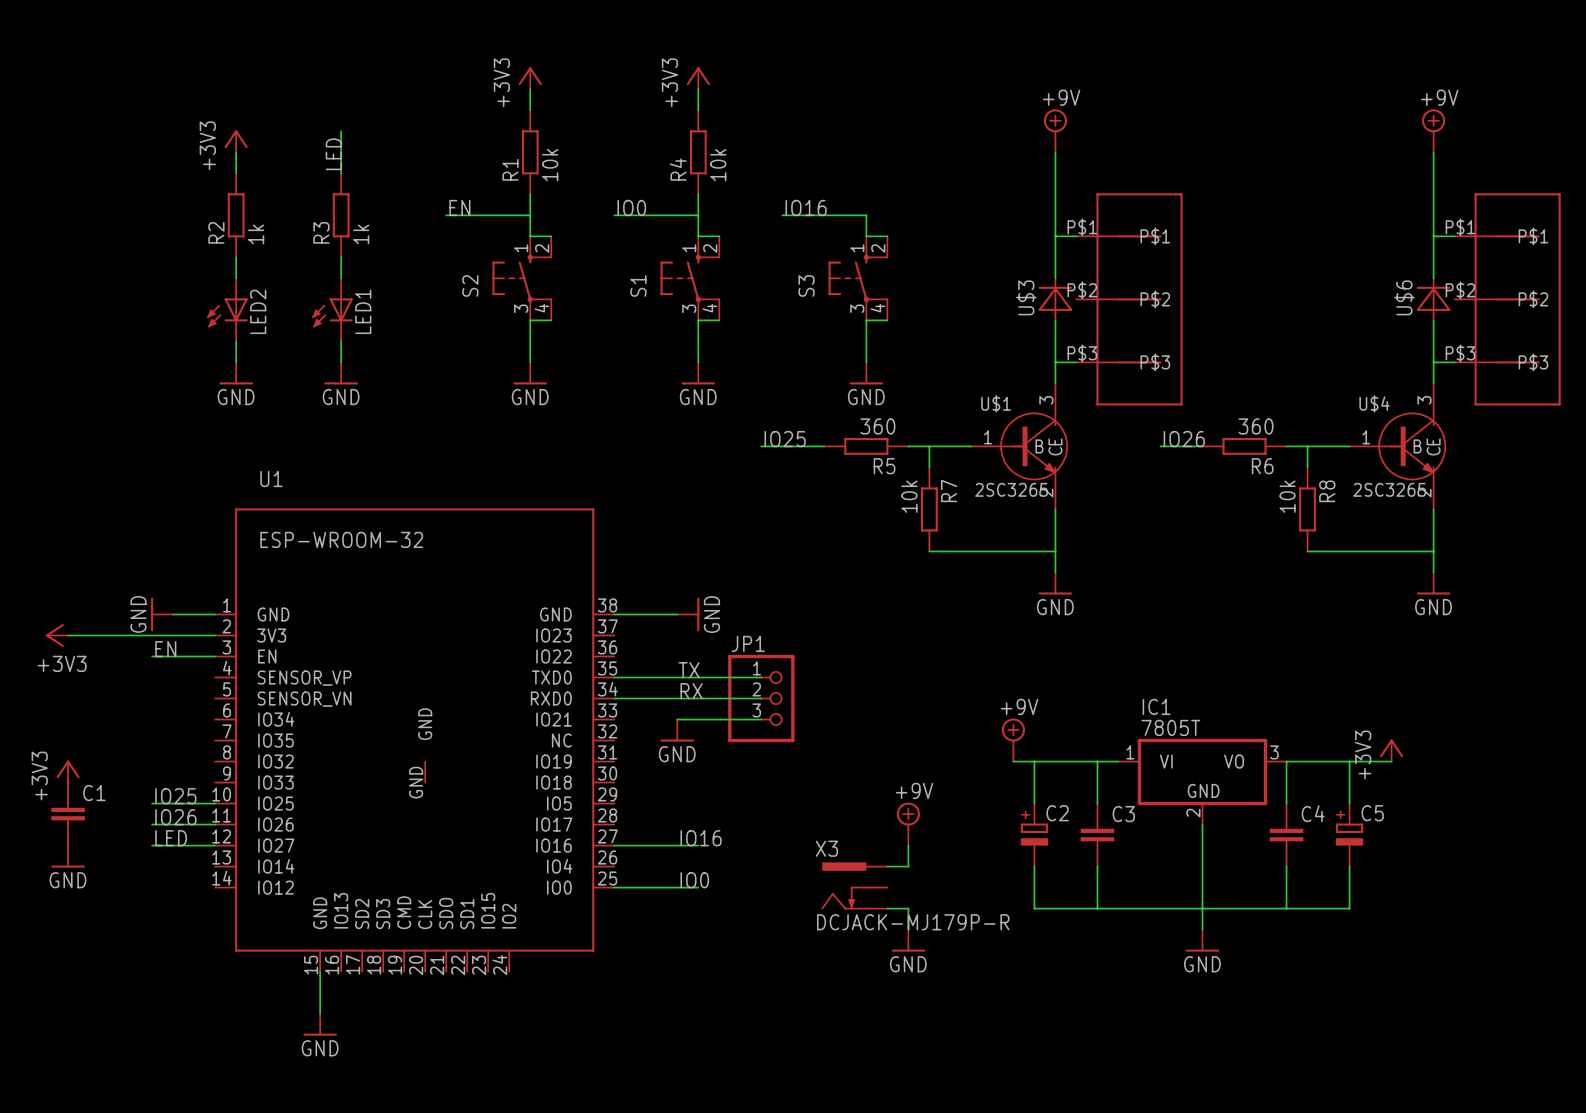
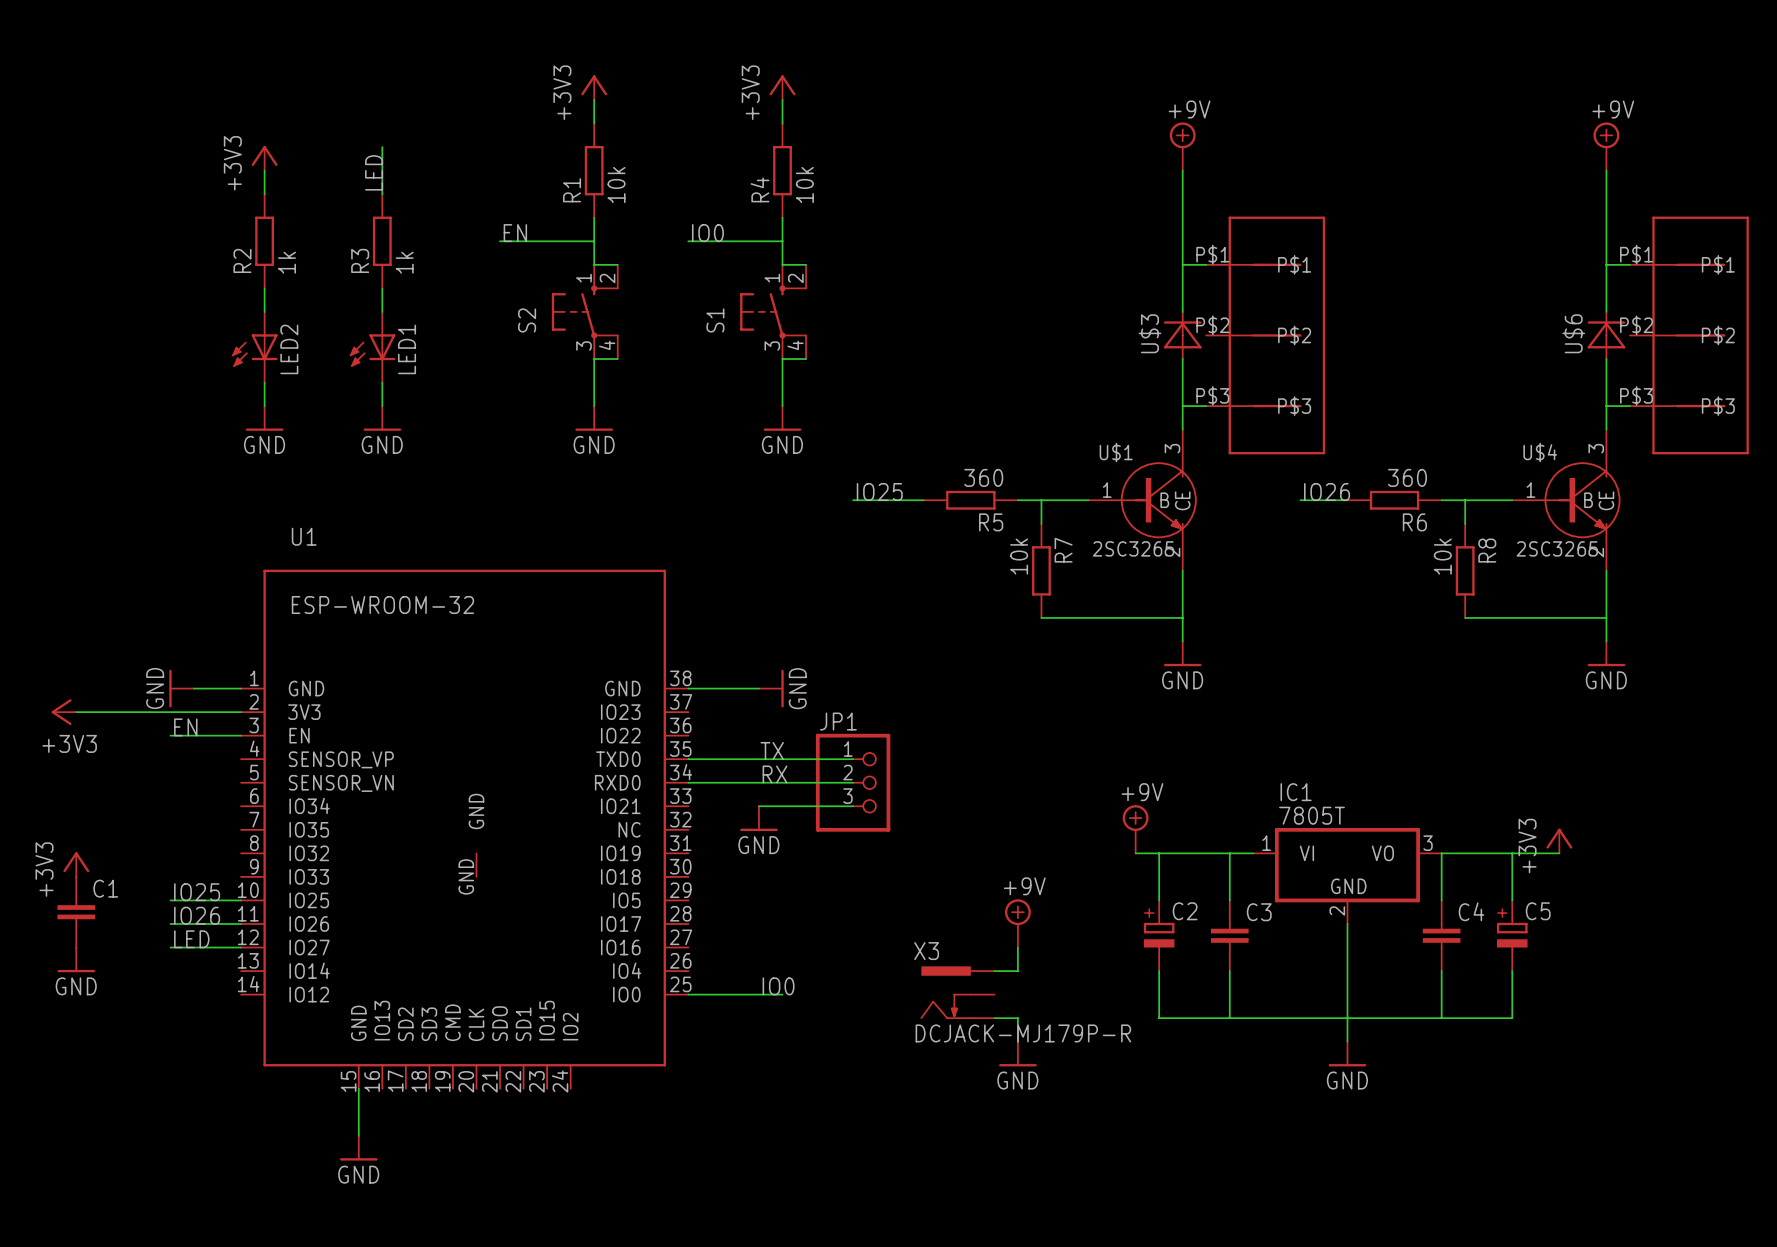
label: IO16 (806, 207) -> none
wire: (782, 215) (866, 215) (866, 236) (887, 236) -> none
S3: (858, 278) -> none
wire: (887, 320) (866, 320) (866, 362) -> none
power symbol: GND (866, 373) -> none
label: IO16 (701, 838) -> none
wire: (614, 845) (698, 845) -> none

